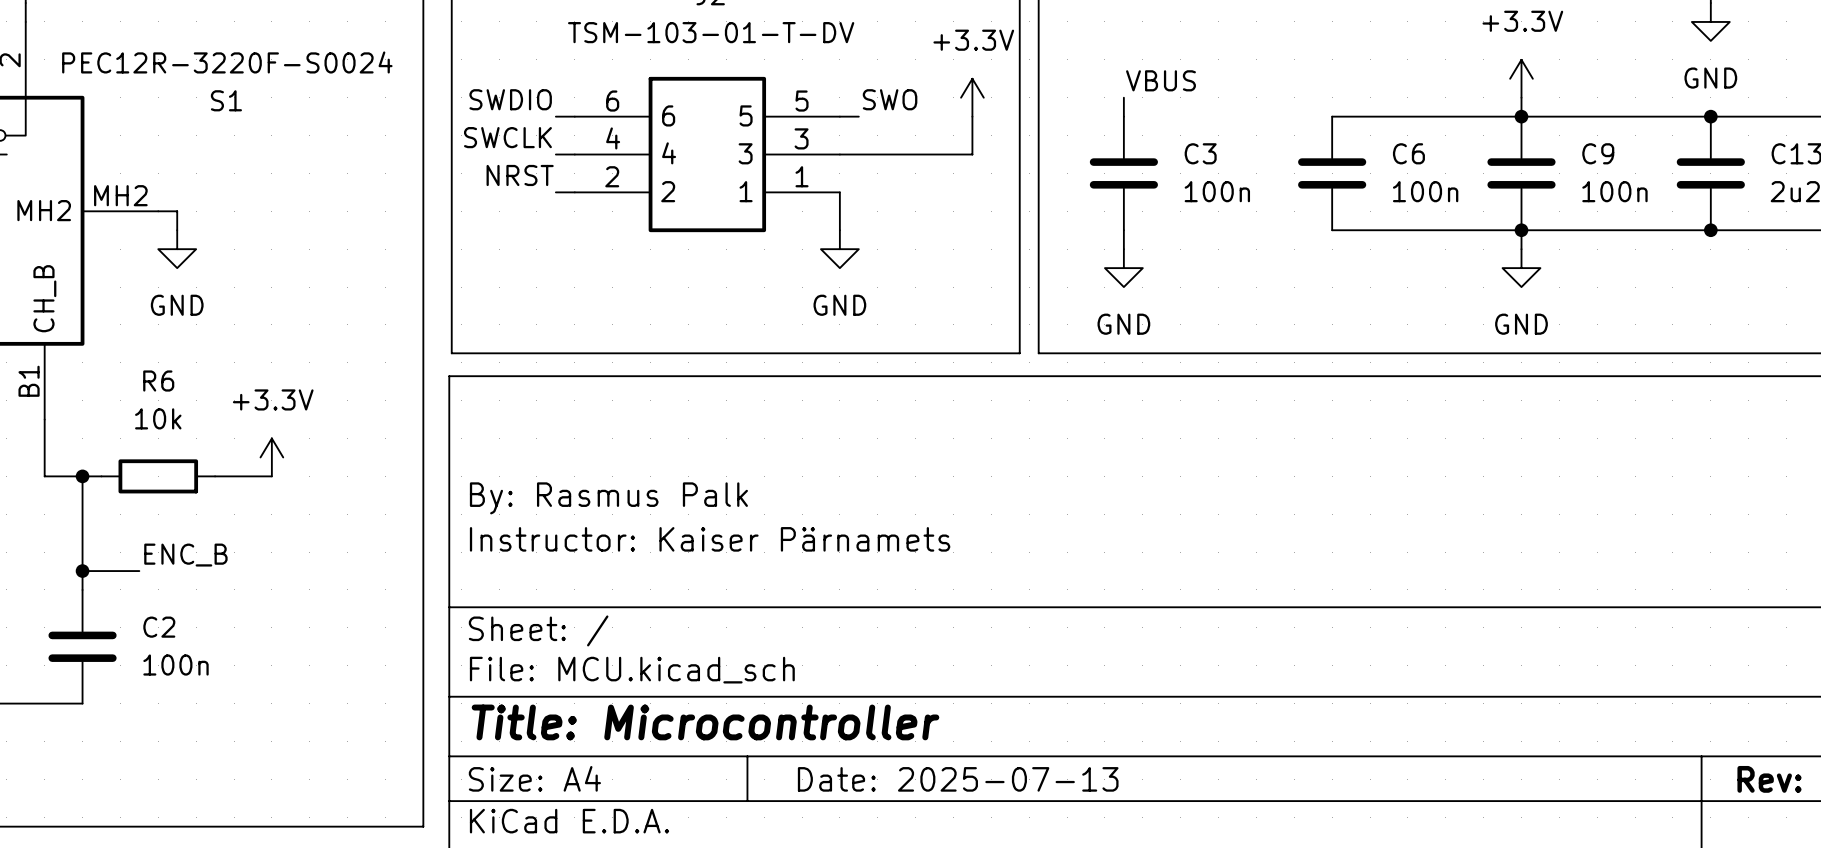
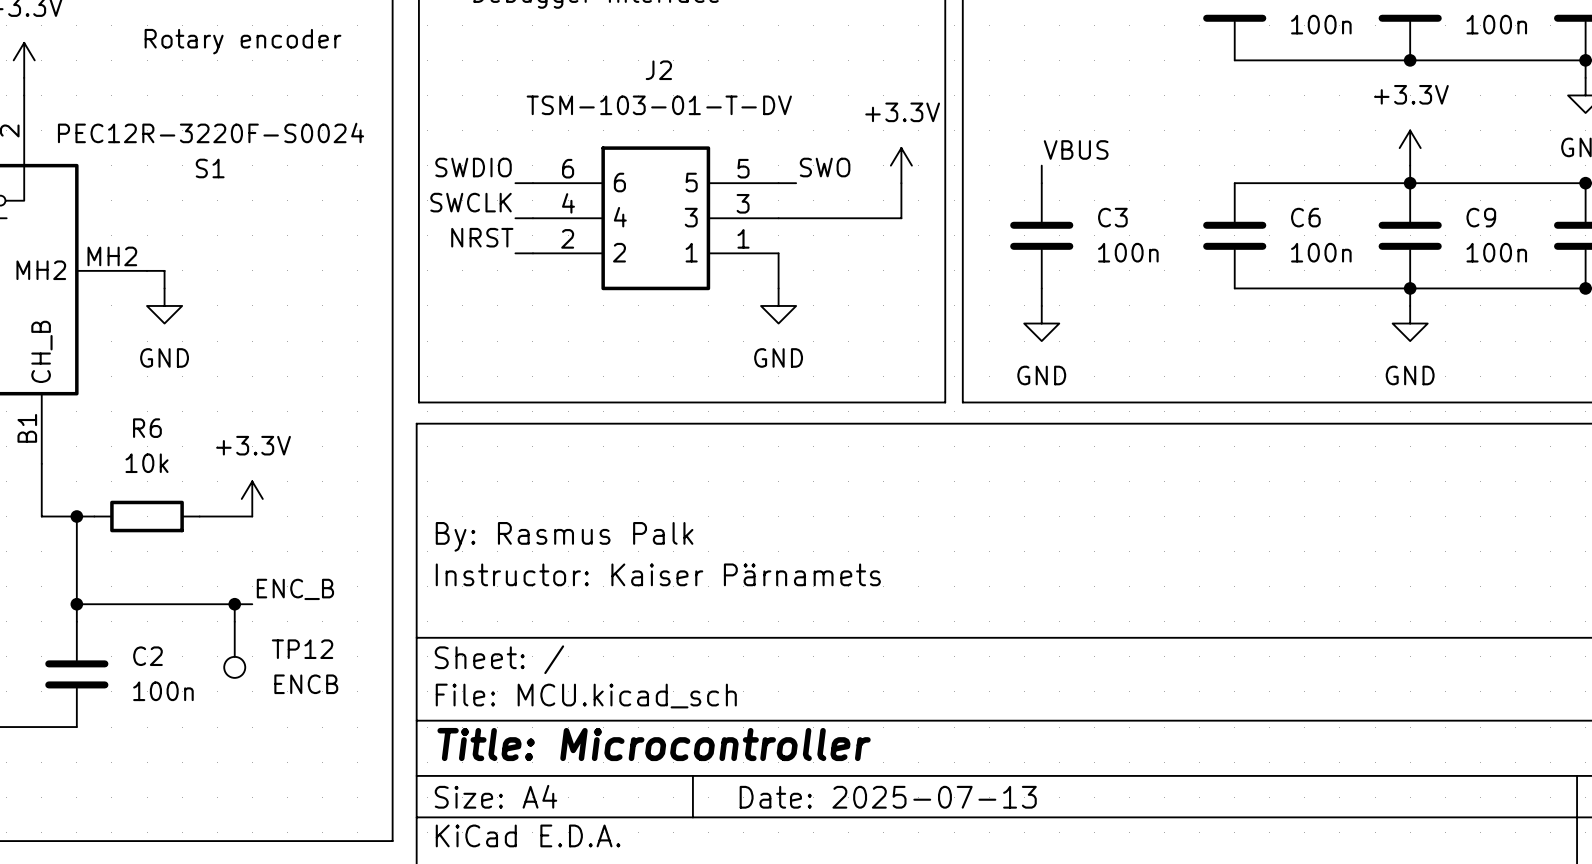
label position: ENC_B (185, 555) -> ENC_B (295, 589)
wire: none -> (129, 604) (252, 604)
wire: none -> (234, 604) (234, 621)
junction: none -> (234, 604)
TP12: none -> ENCB (234, 649)

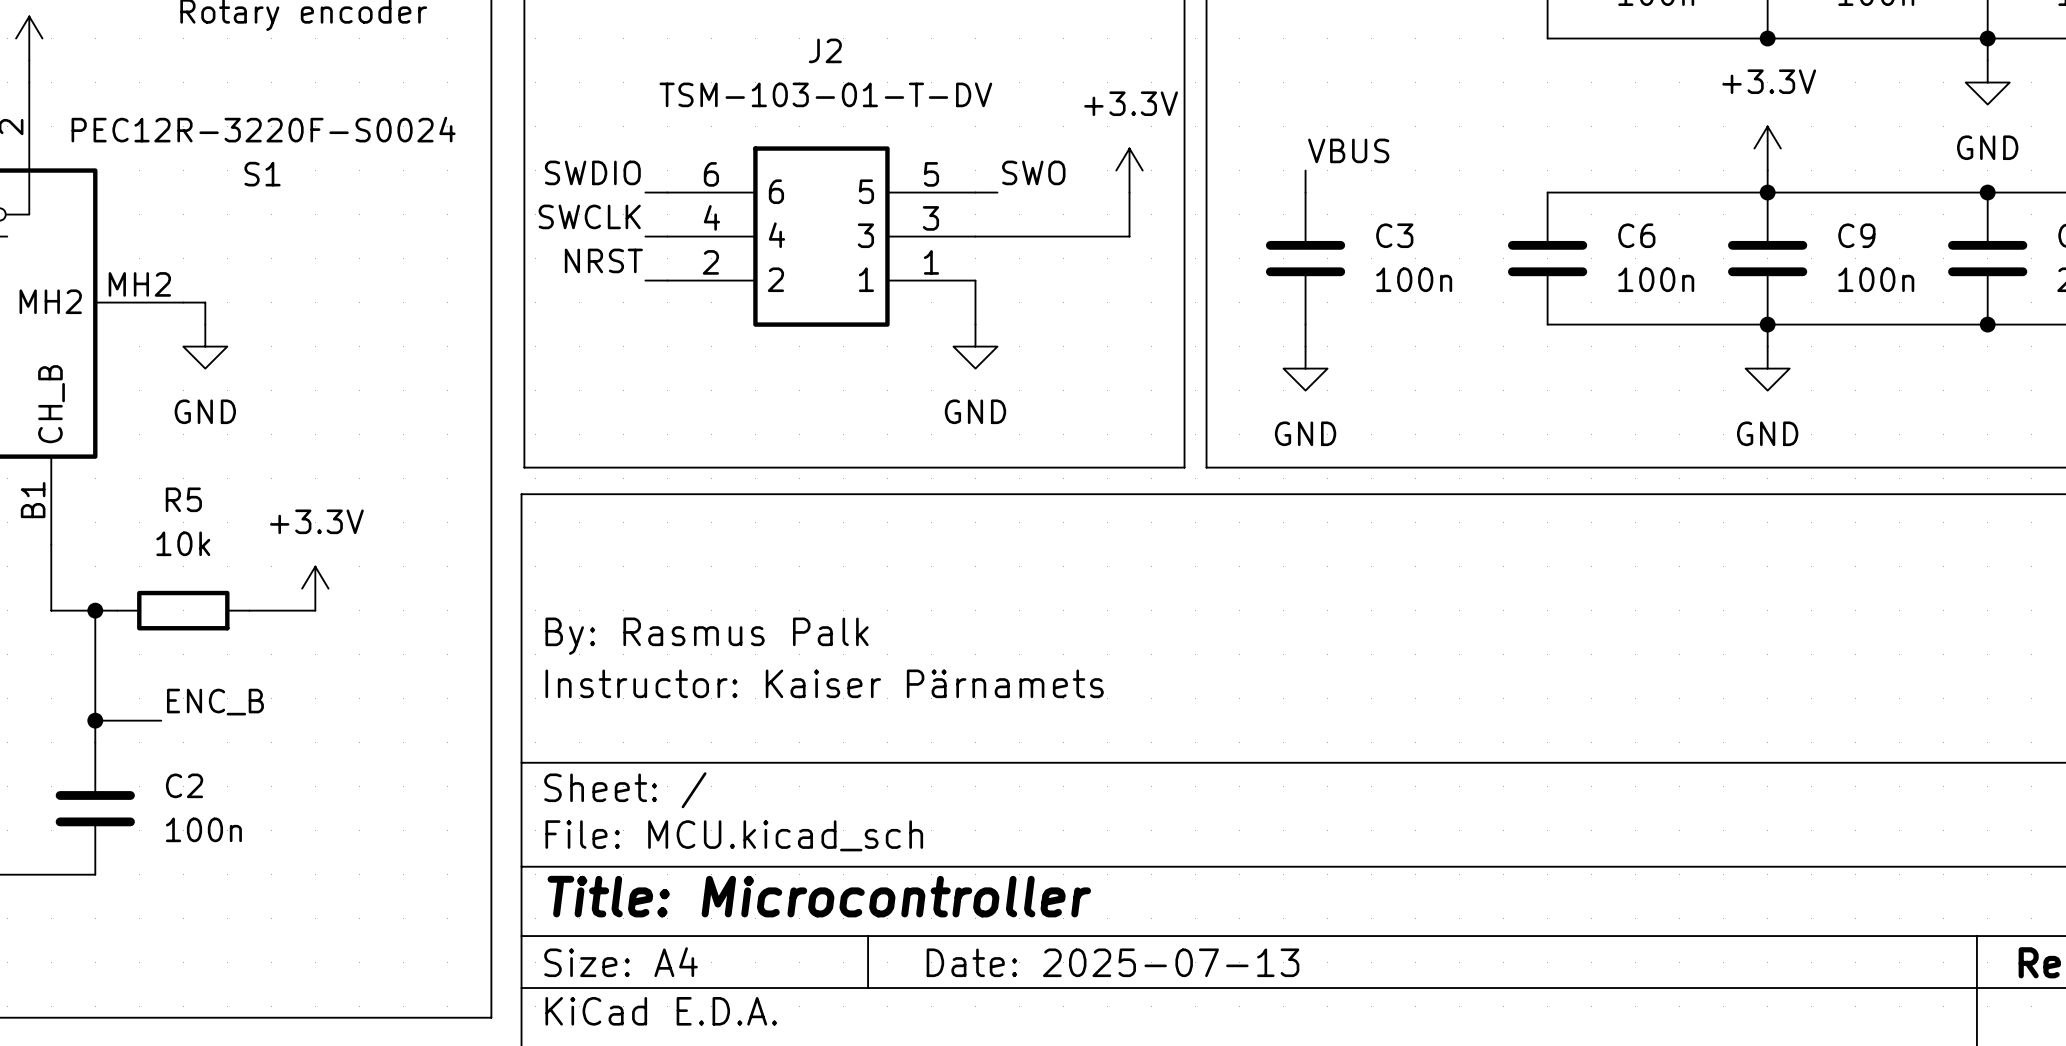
R6 name: R6 (147, 428) -> R5 (183, 499)
label position: ENC_B (295, 589) -> ENC_B (215, 702)
wire: (129, 604) (252, 604) -> none
wire: (234, 604) (234, 621) -> none
junction: (234, 604) -> none
TP12: ENCB (234, 649) -> none

